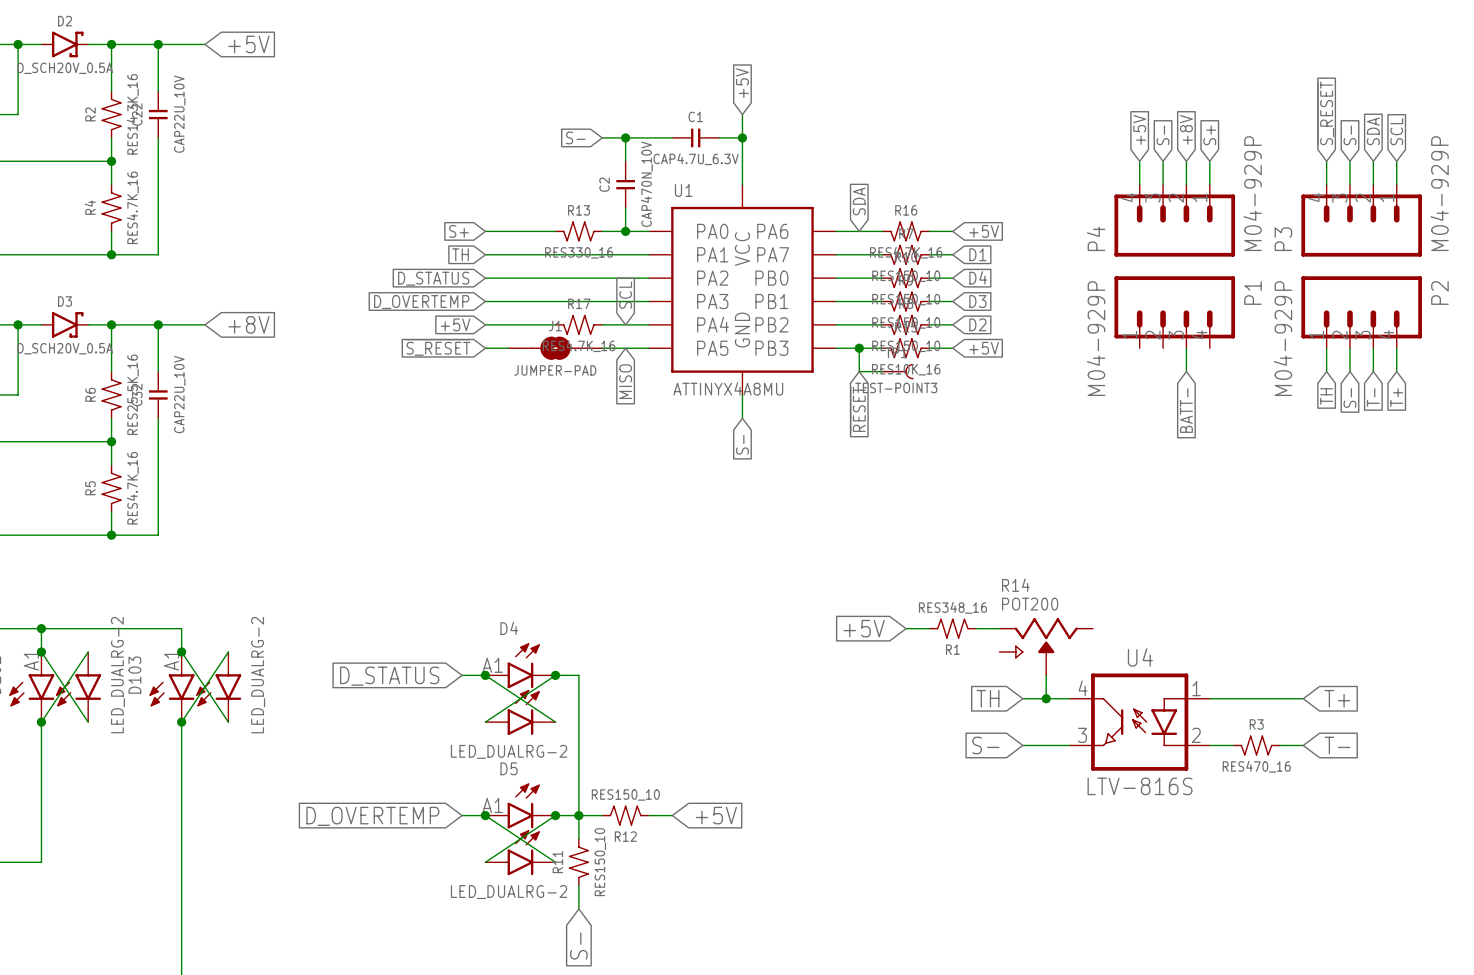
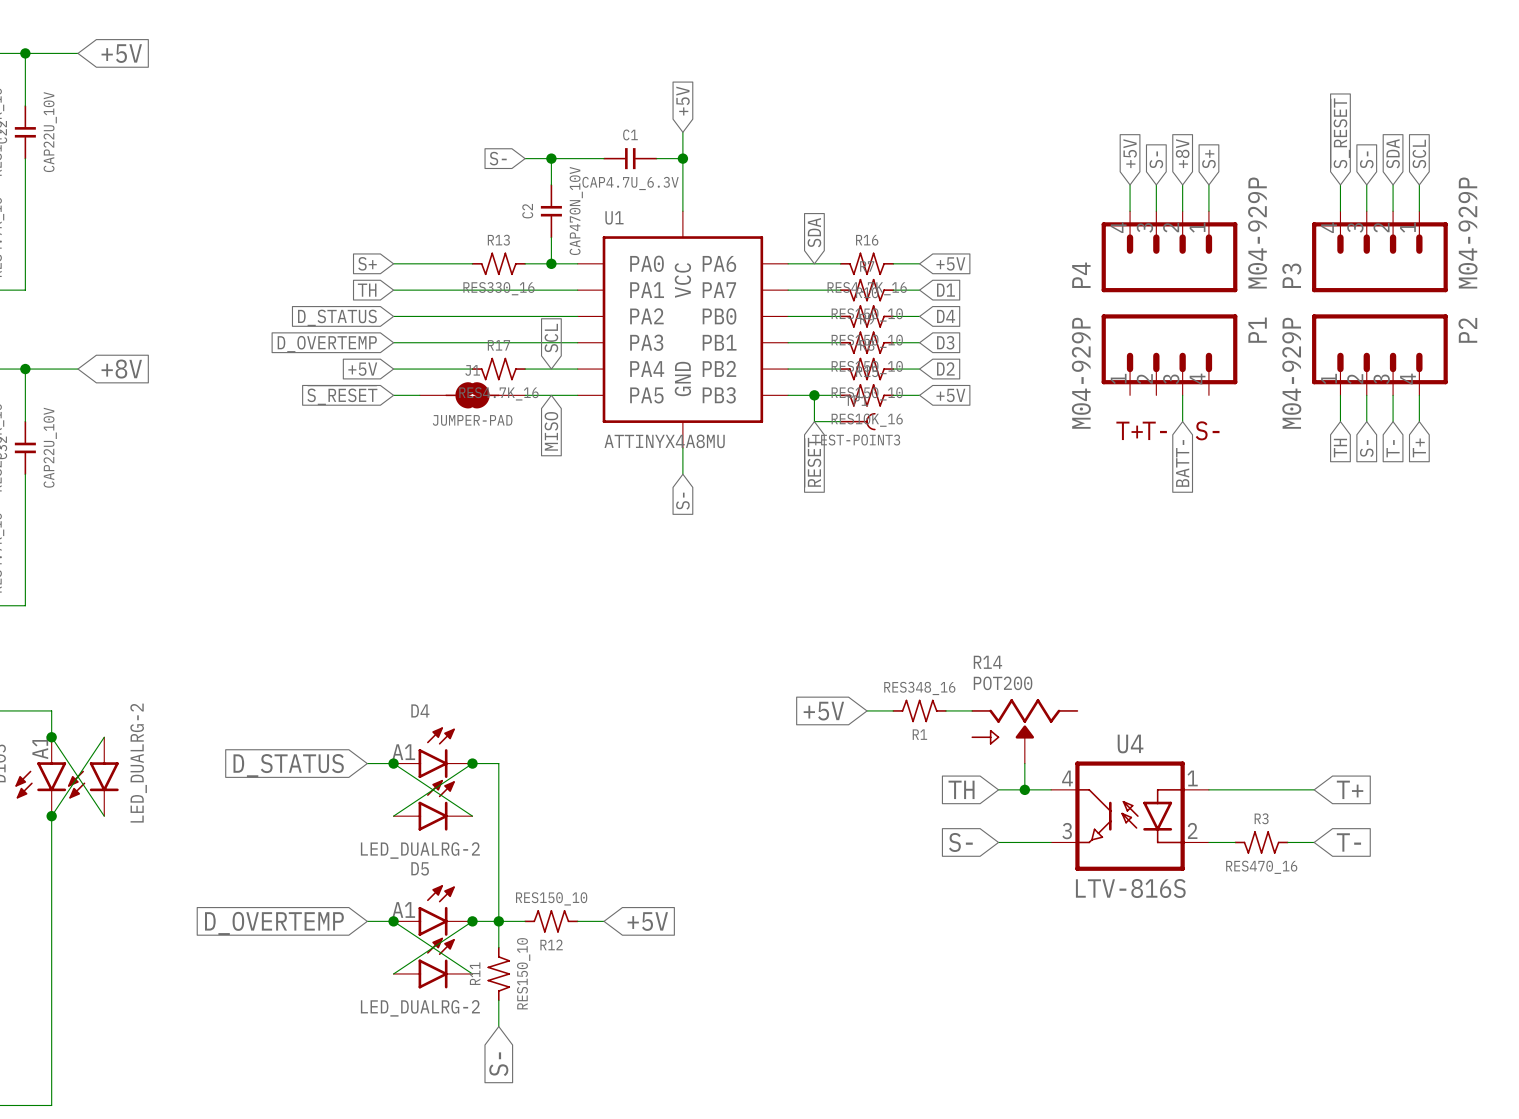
text: none -> T+ (1129, 430)
text: none -> T- (1154, 430)
text: none -> S- (1207, 430)

